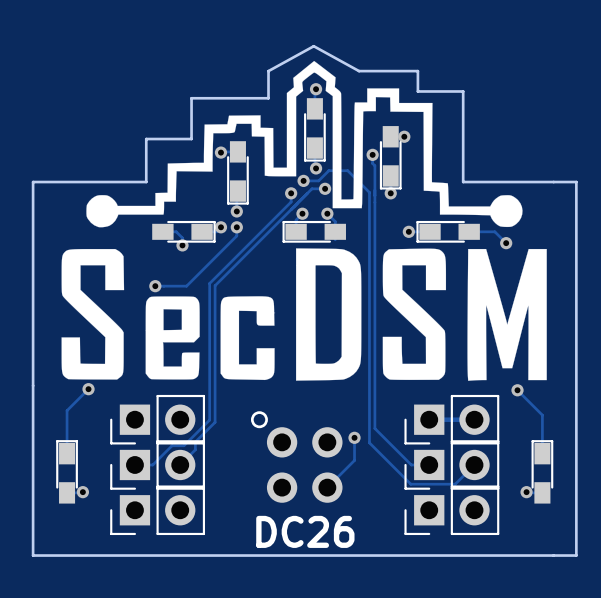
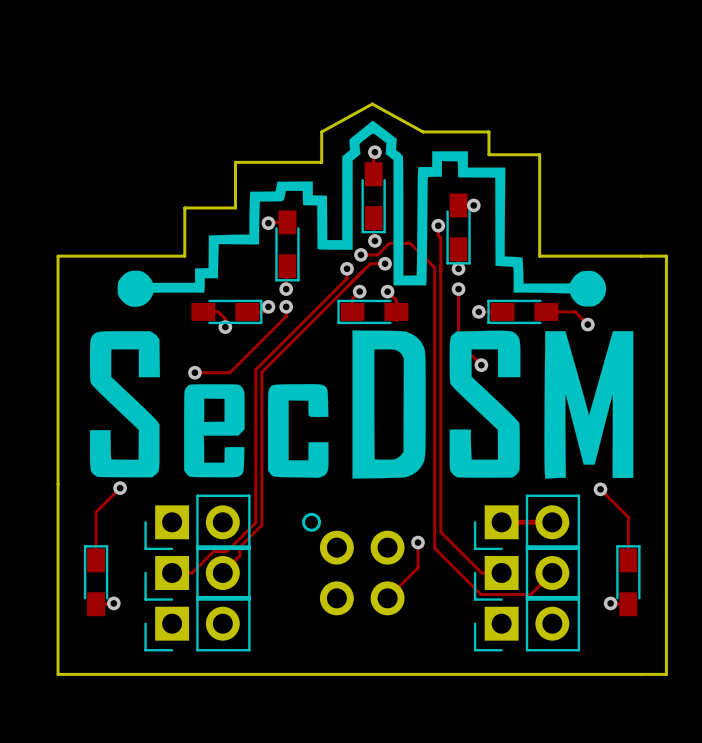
track: none -> (458, 289) (458, 342) (481, 365)
via: none -> (458, 289)
via: none -> (481, 365)
text: DC26 (305, 531) -> none

